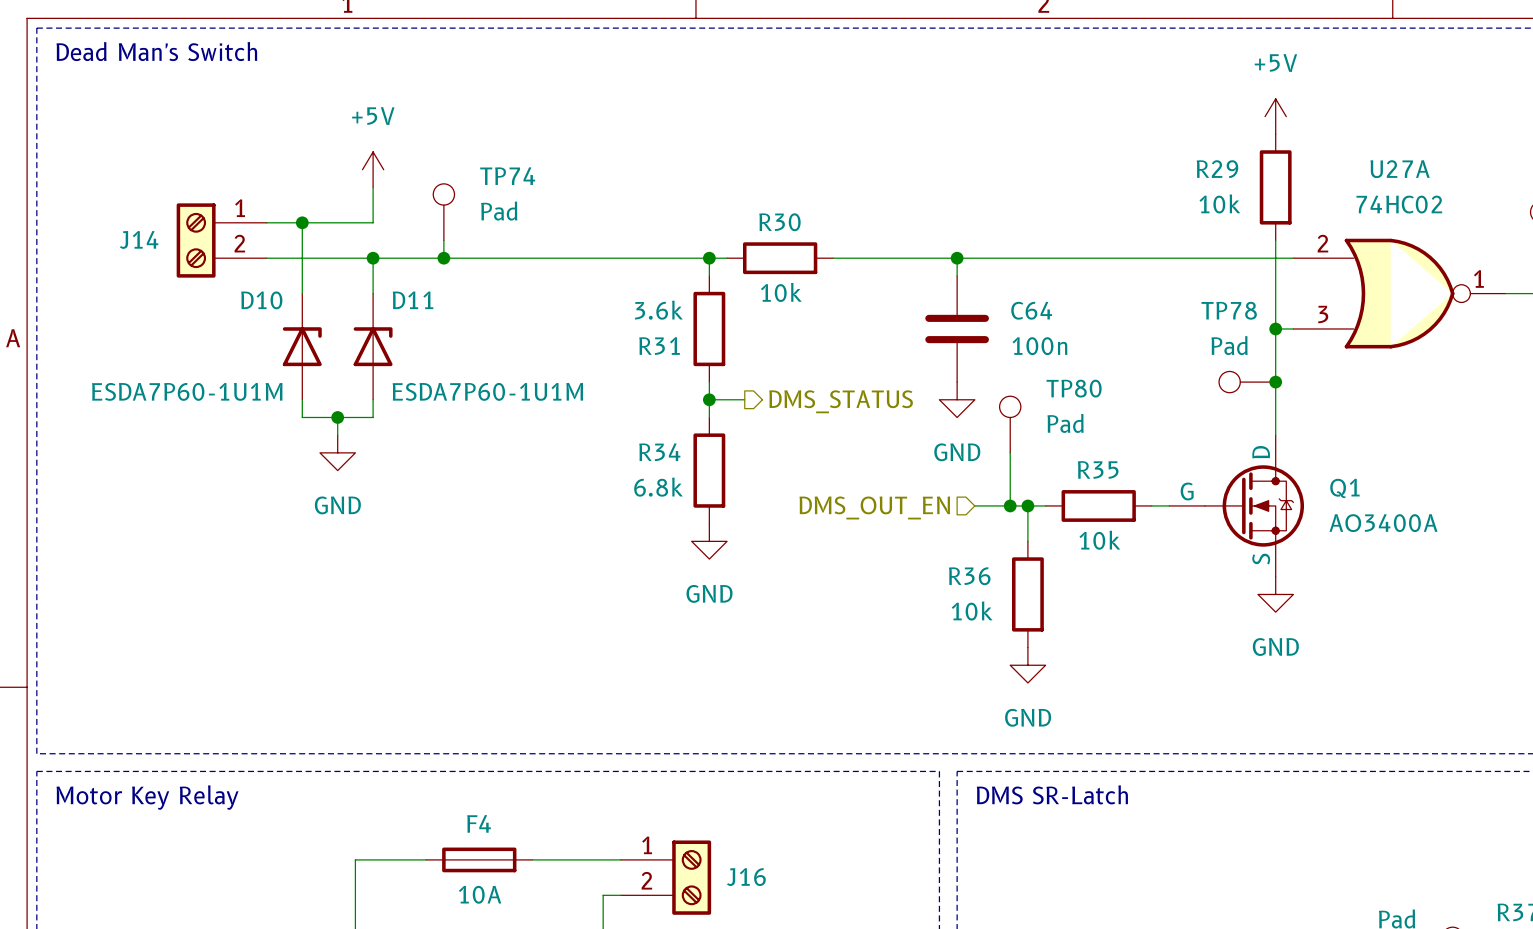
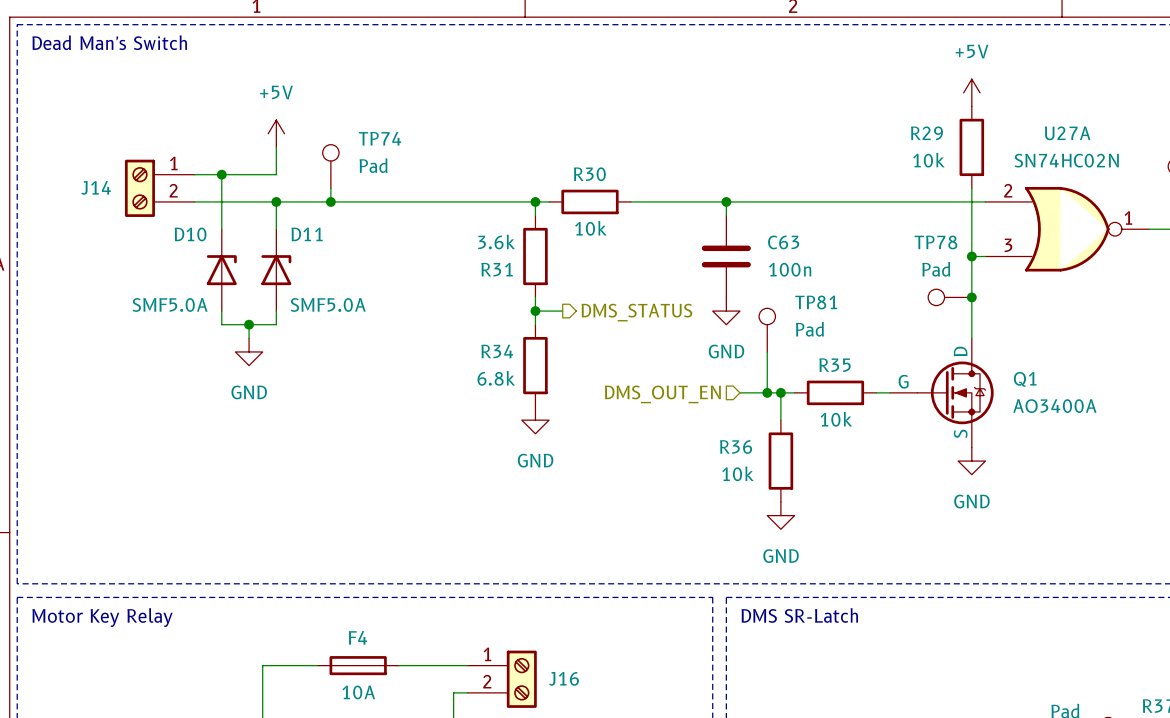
U27A value: 74HC02 (1399, 204) -> SN74HC02N (1066, 160)
C64 name: C64 (1031, 310) -> C63 (783, 242)
TP80 name: TP80 (1074, 388) -> TP81 (816, 302)
D10 value: ESDA7P60-1U1M (187, 391) -> SMF5.0A (170, 304)
D11 value: ESDA7P60-1U1M (487, 391) -> SMF5.0A (328, 304)

